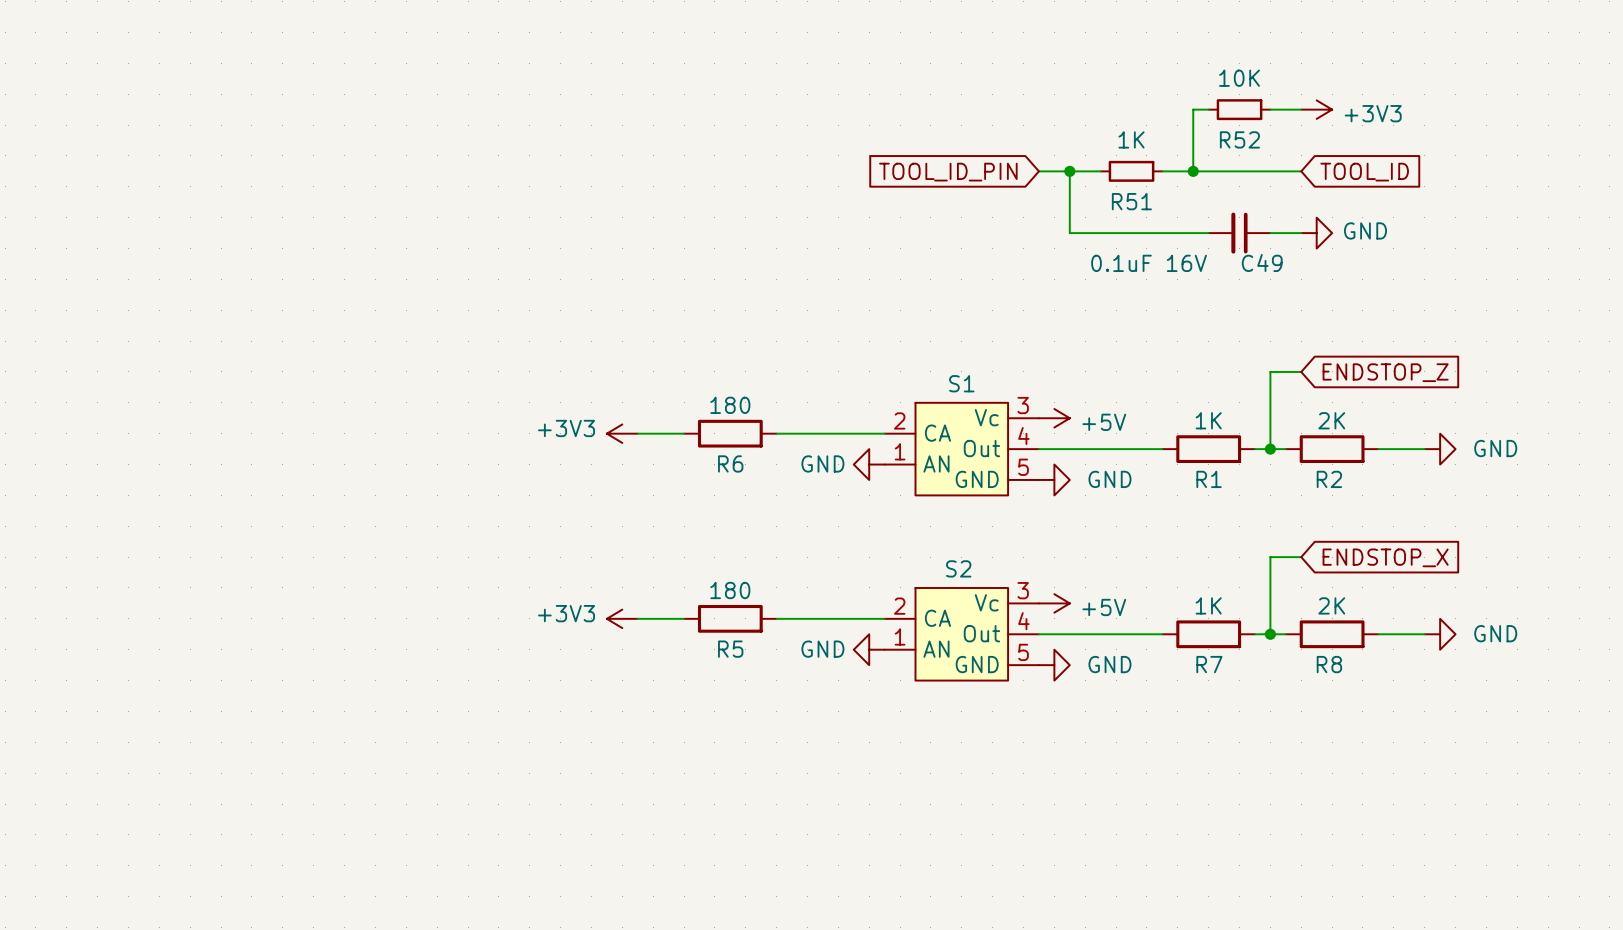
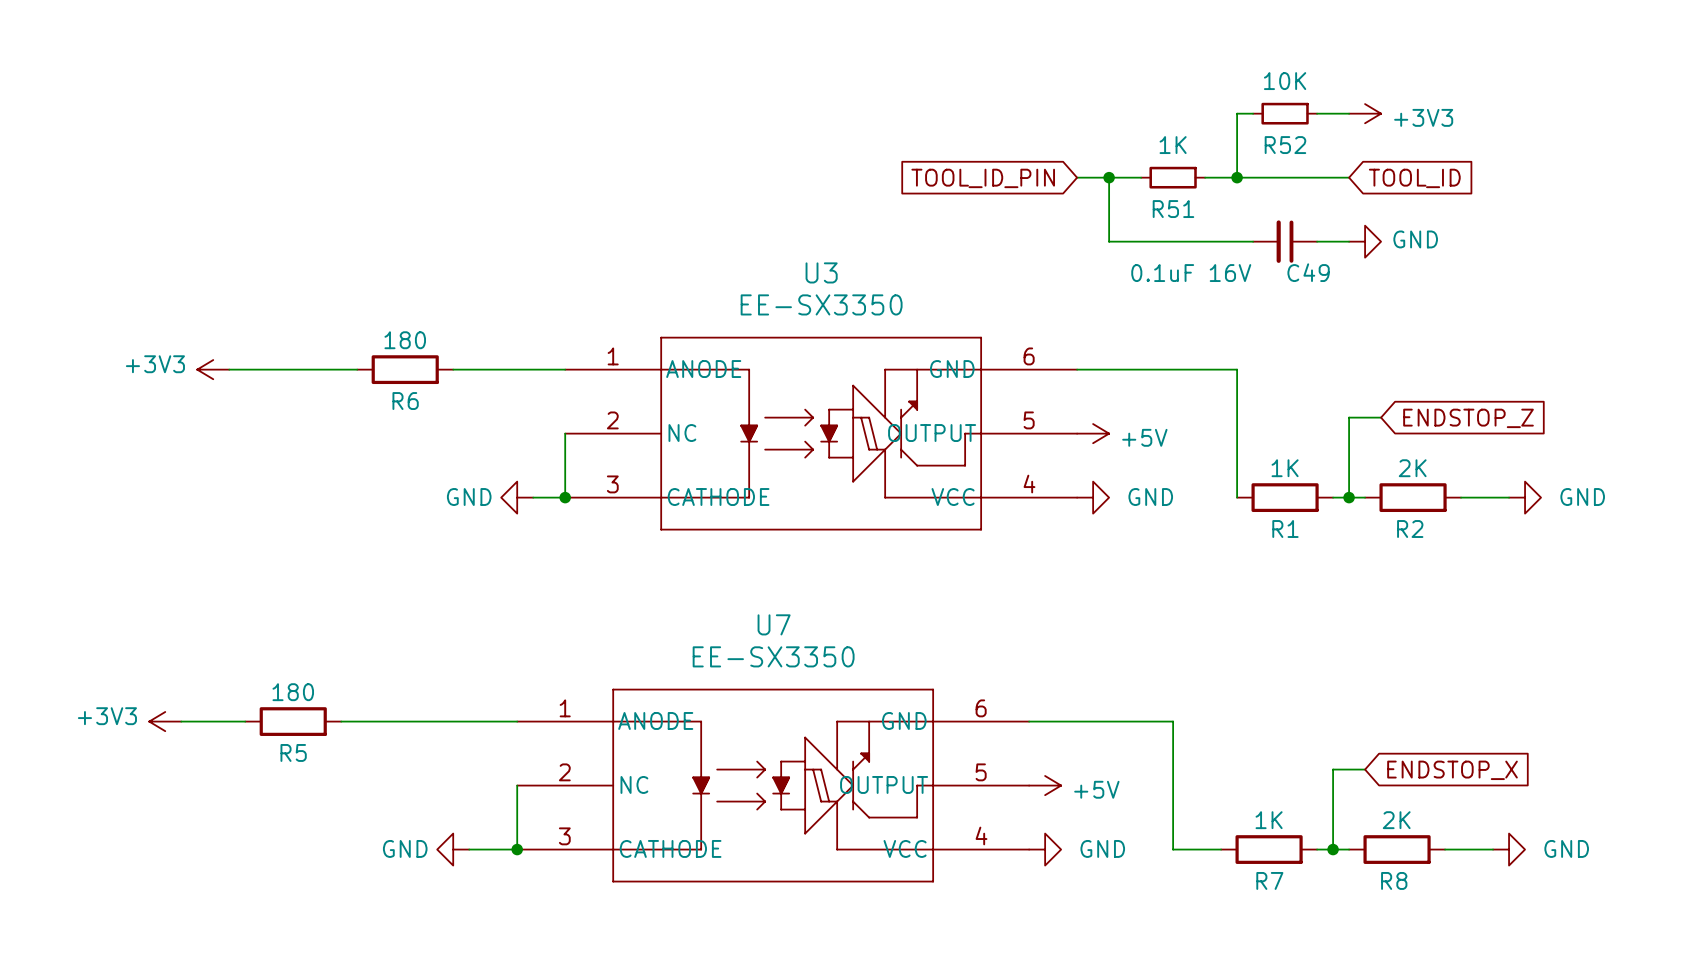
power symbol: none -> +3V3 (213, 369)
wire: none -> (229, 369) (357, 369)
wire: none -> (453, 369) (565, 369)
wire: none -> (1077, 369) (1237, 369) (1237, 497)
wire: (1301, 371) (1270, 371) (1270, 449) -> (1381, 417) (1349, 417) (1349, 497)
global label position: ENDSTOP_Z (1385, 372) -> ENDSTOP_Z (1468, 418)
wire: none -> (565, 433) (565, 497) (533, 497)
U3: none -> EE-SX3350 (821, 433)
power symbol: +3V3 (622, 433) -> none
wire: (637, 433) (684, 433) -> none
R6 position: (730, 433) -> (405, 369)
wire: (776, 433) (884, 433) -> none
S1: (961, 449) -> none
wire: (1038, 449) (1162, 449) -> none
R1 position: (1208, 449) -> (1285, 497)
wire: (1254, 449) (1285, 449) -> (1333, 497) (1365, 497)
junction position: (1270, 449) -> (1349, 497)
R2 position: (1332, 449) -> (1413, 497)
wire: (1378, 449) (1424, 449) -> (1461, 497) (1509, 497)
power symbol position: GND (1440, 449) -> GND (1525, 497)
power symbol: GND (869, 464) -> none
power symbol: none -> GND (517, 497)
junction: none -> (565, 497)
wire: (1301, 557) (1270, 557) (1270, 634) -> (1365, 769) (1333, 769) (1333, 849)
global label position: ENDSTOP_X (1385, 557) -> ENDSTOP_X (1452, 770)
power symbol position: +5V (1054, 603) -> +5V (1045, 785)
power symbol: +3V3 (622, 618) -> none
wire: (637, 618) (684, 618) -> none
R5 position: (730, 618) -> (293, 721)
wire: (776, 618) (884, 618) -> none
S2: (961, 634) -> none
wire: (1038, 634) (1162, 634) -> none
R7 position: (1208, 634) -> (1269, 849)
wire: (1254, 634) (1285, 634) -> (1317, 849) (1349, 849)
junction: (1270, 634) -> none
R8 position: (1332, 634) -> (1397, 849)
wire: (1378, 634) (1424, 634) -> (1445, 849) (1493, 849)
power symbol: GND (1440, 634) -> none
power symbol: GND (869, 649) -> none
power symbol: GND (1054, 665) -> none
power symbol: none -> +3V3 (165, 721)
wire: none -> (181, 721) (245, 721)
wire: none -> (341, 721) (517, 721)
wire: none -> (1029, 721) (1173, 721) (1173, 849) (1221, 849)
wire: none -> (517, 785) (517, 849) (469, 849)
U7: none -> EE-SX3350 (773, 785)
power symbol: none -> GND (453, 849)
junction: none -> (517, 849)
power symbol: none -> GND (1045, 849)
junction: none -> (1333, 849)
power symbol: none -> GND (1509, 849)

